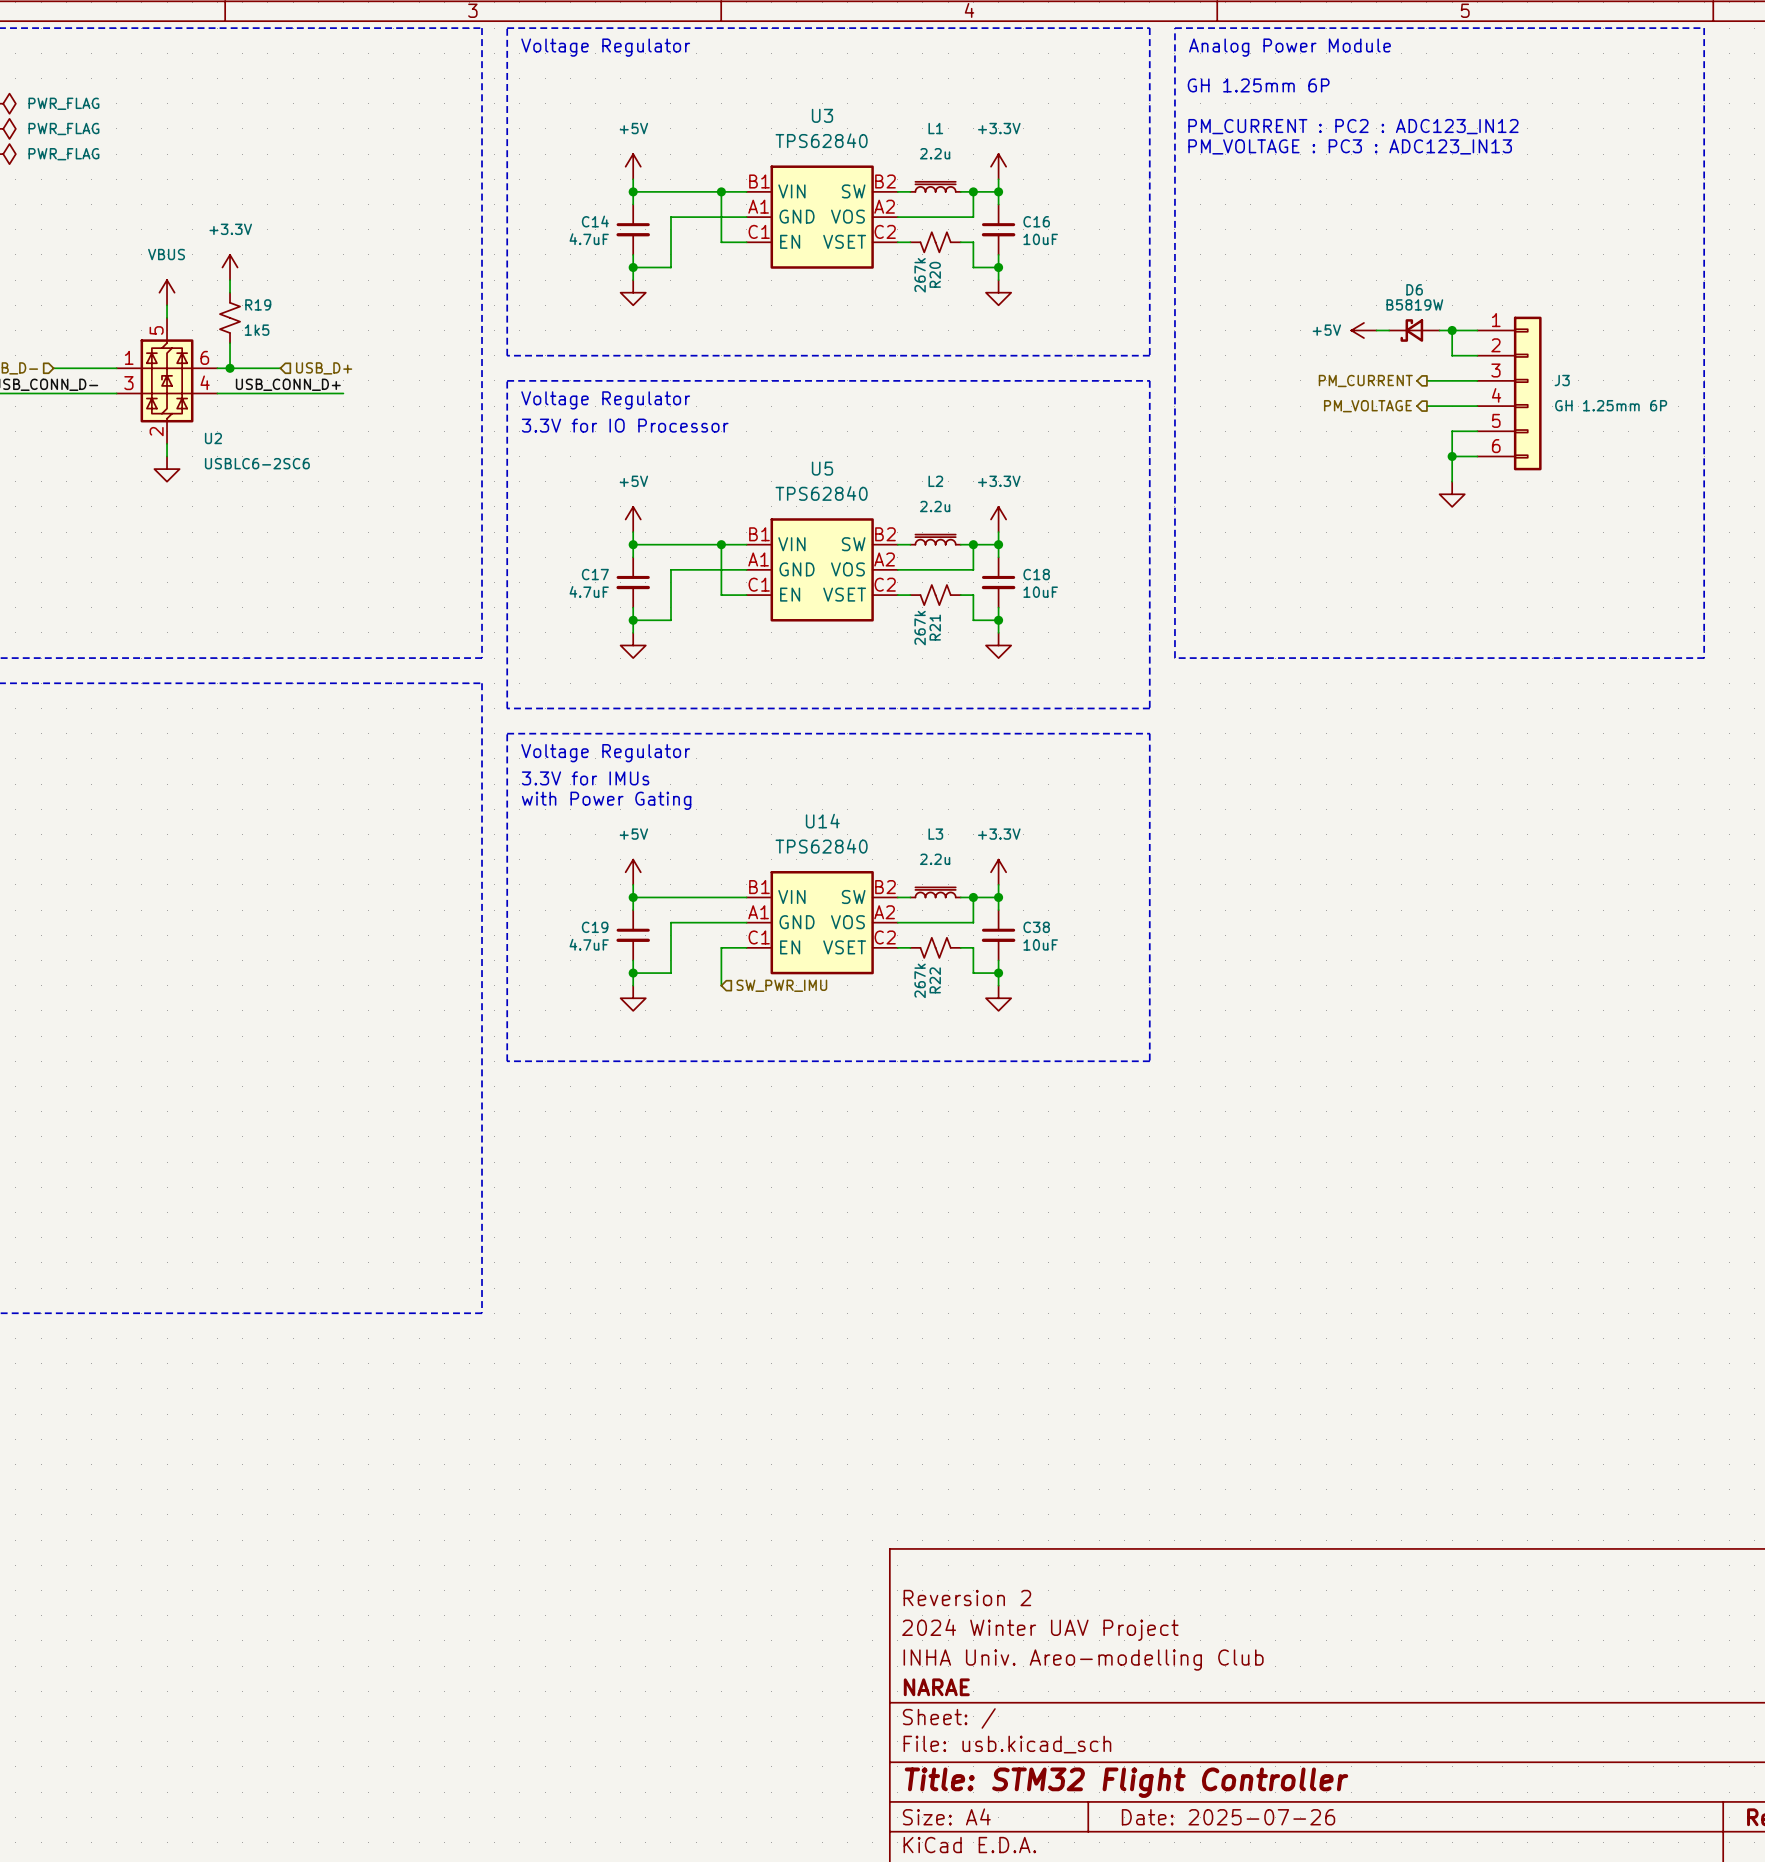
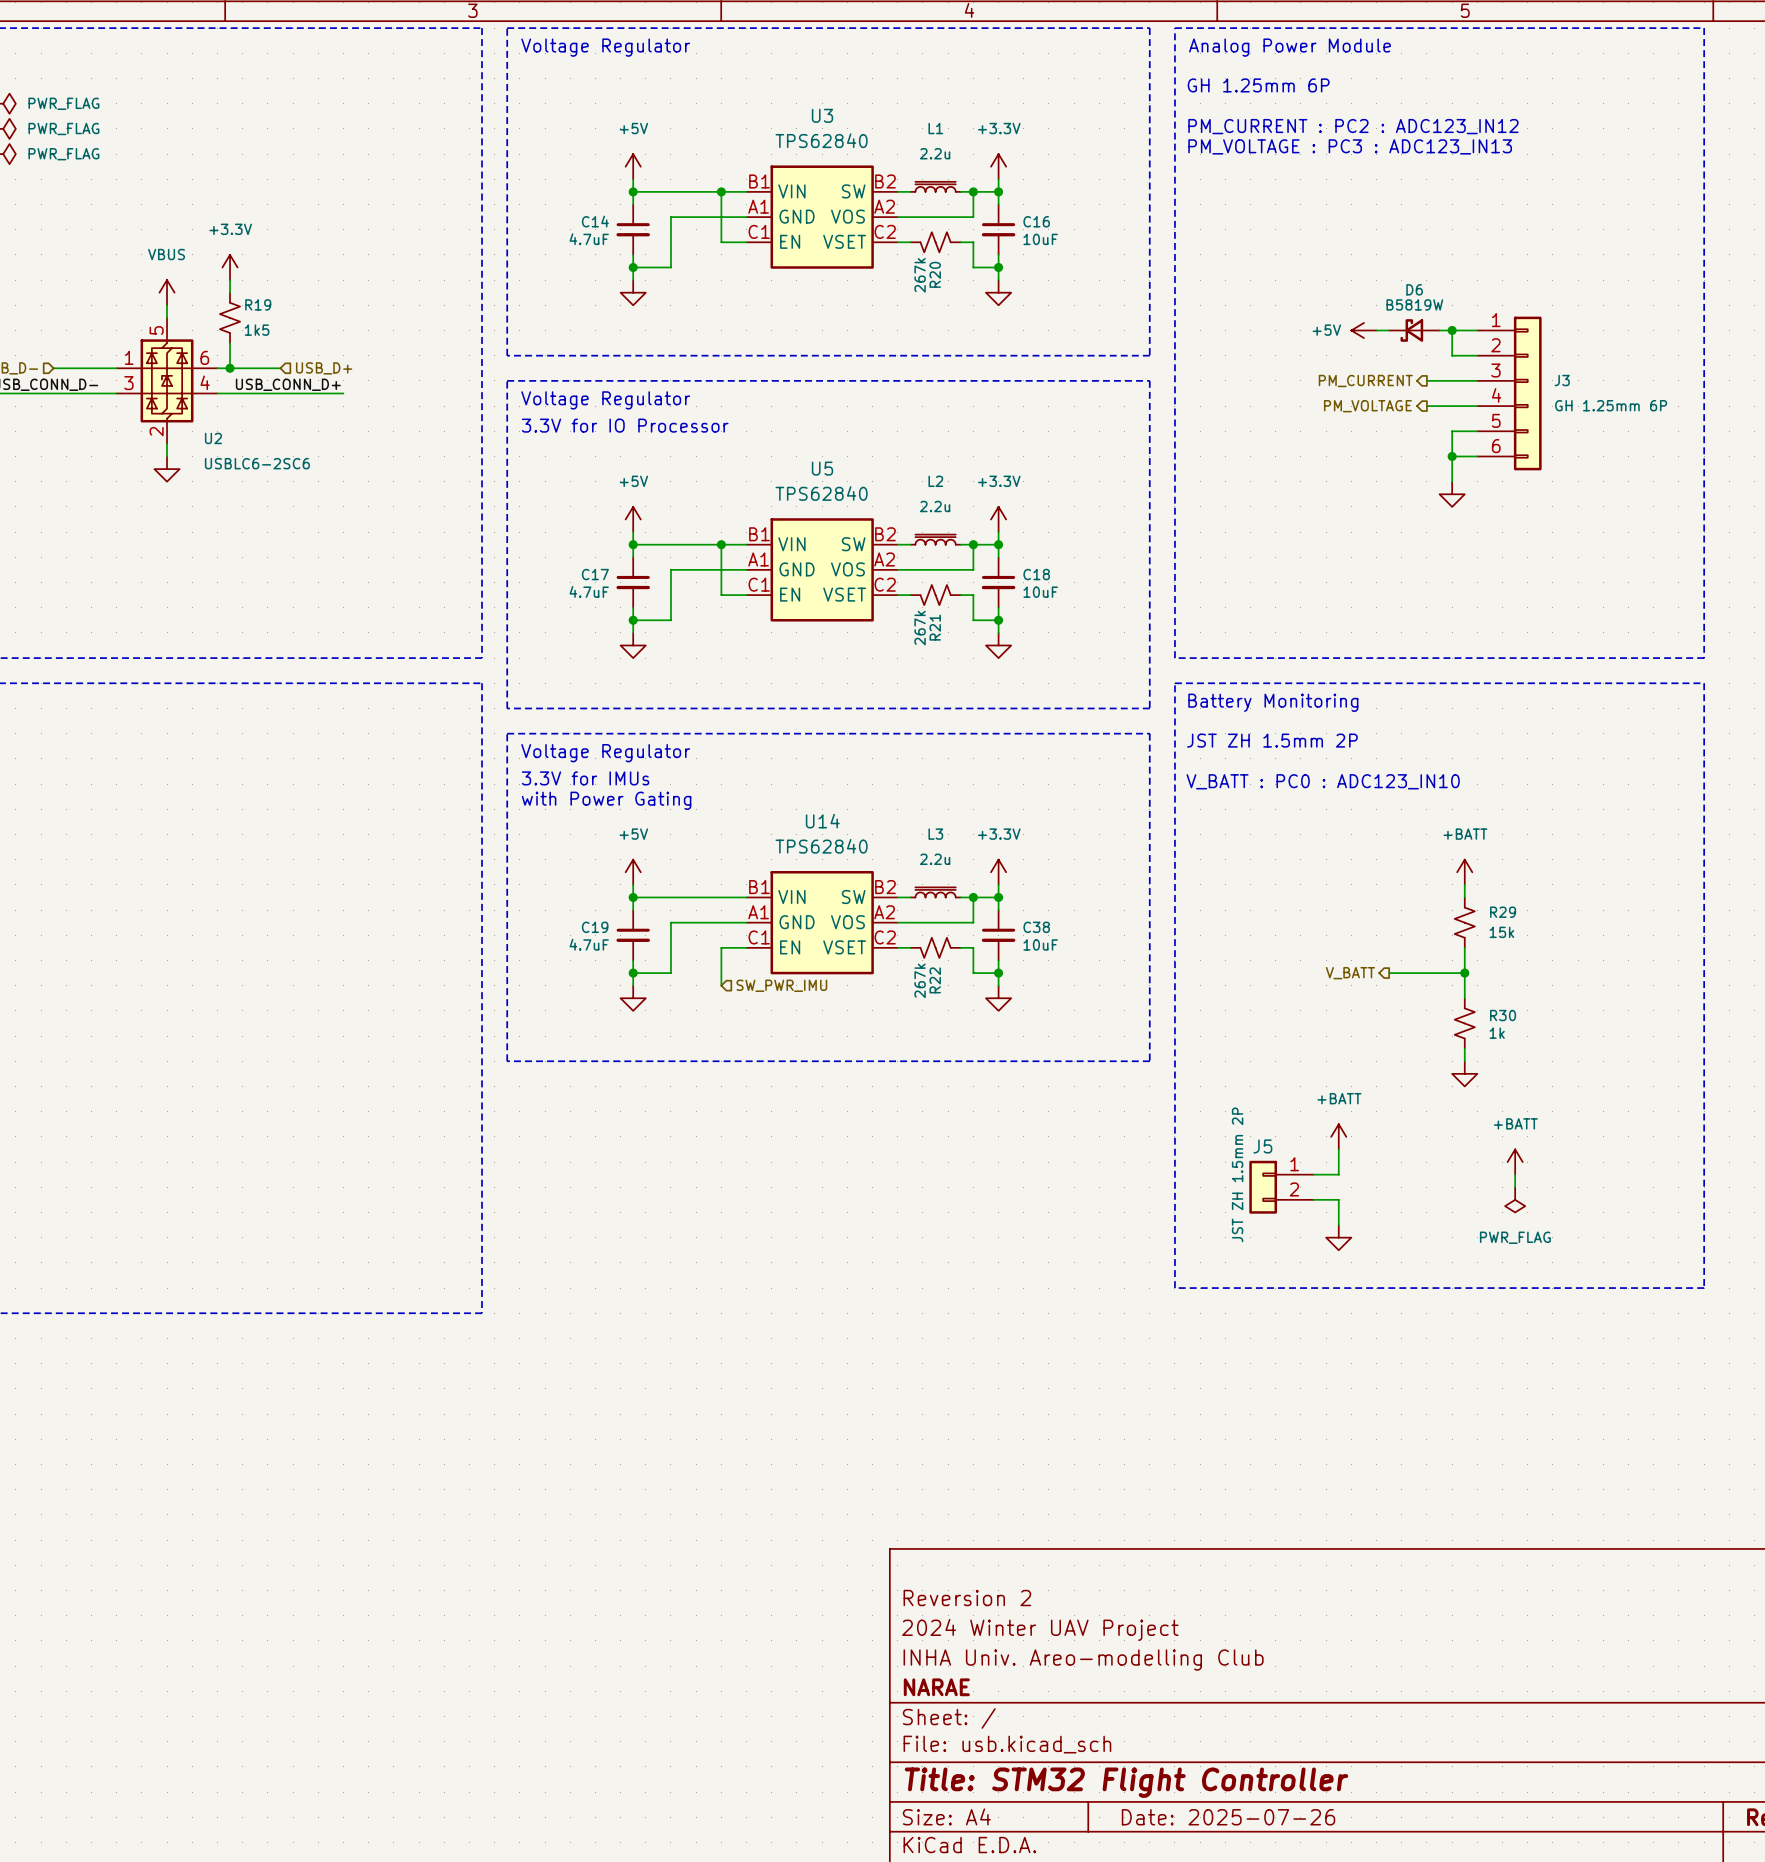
line: none -> (1174, 683) (1704, 683) (1704, 1288) (1174, 1288) (1174, 683)
text: none -> Battery Monitoring (1273, 702)
text: none -> JST ZH 1.5mm 2P (1272, 740)
text: none -> V_BATT : PC0 : ADC123_IN10 (1323, 781)
power symbol: none -> +BATT (1464, 872)
wire: none -> (1464, 884) (1464, 897)
R29: none -> 15k (1464, 922)
wire: none -> (1464, 947) (1464, 998)
hierarchical label: none -> V_BATT (1350, 973)
wire: none -> (1389, 973) (1464, 973)
junction: none -> (1464, 973)
R30: none -> 1k (1464, 1023)
wire: none -> (1464, 1048) (1464, 1061)
power symbol: none -> (1464, 1073)
power symbol: none -> +BATT (1338, 1136)
wire: none -> (1338, 1149) (1338, 1174) (1313, 1174)
power symbol: none -> +BATT (1515, 1162)
wire: none -> (1515, 1174) (1515, 1187)
J5: none -> JST ZH 1.5mm 2P (1281, 1187)
wire: none -> (1313, 1199) (1338, 1199) (1338, 1225)
power symbol: none -> PWR_FLAG (1515, 1199)
power symbol: none -> (1338, 1237)

